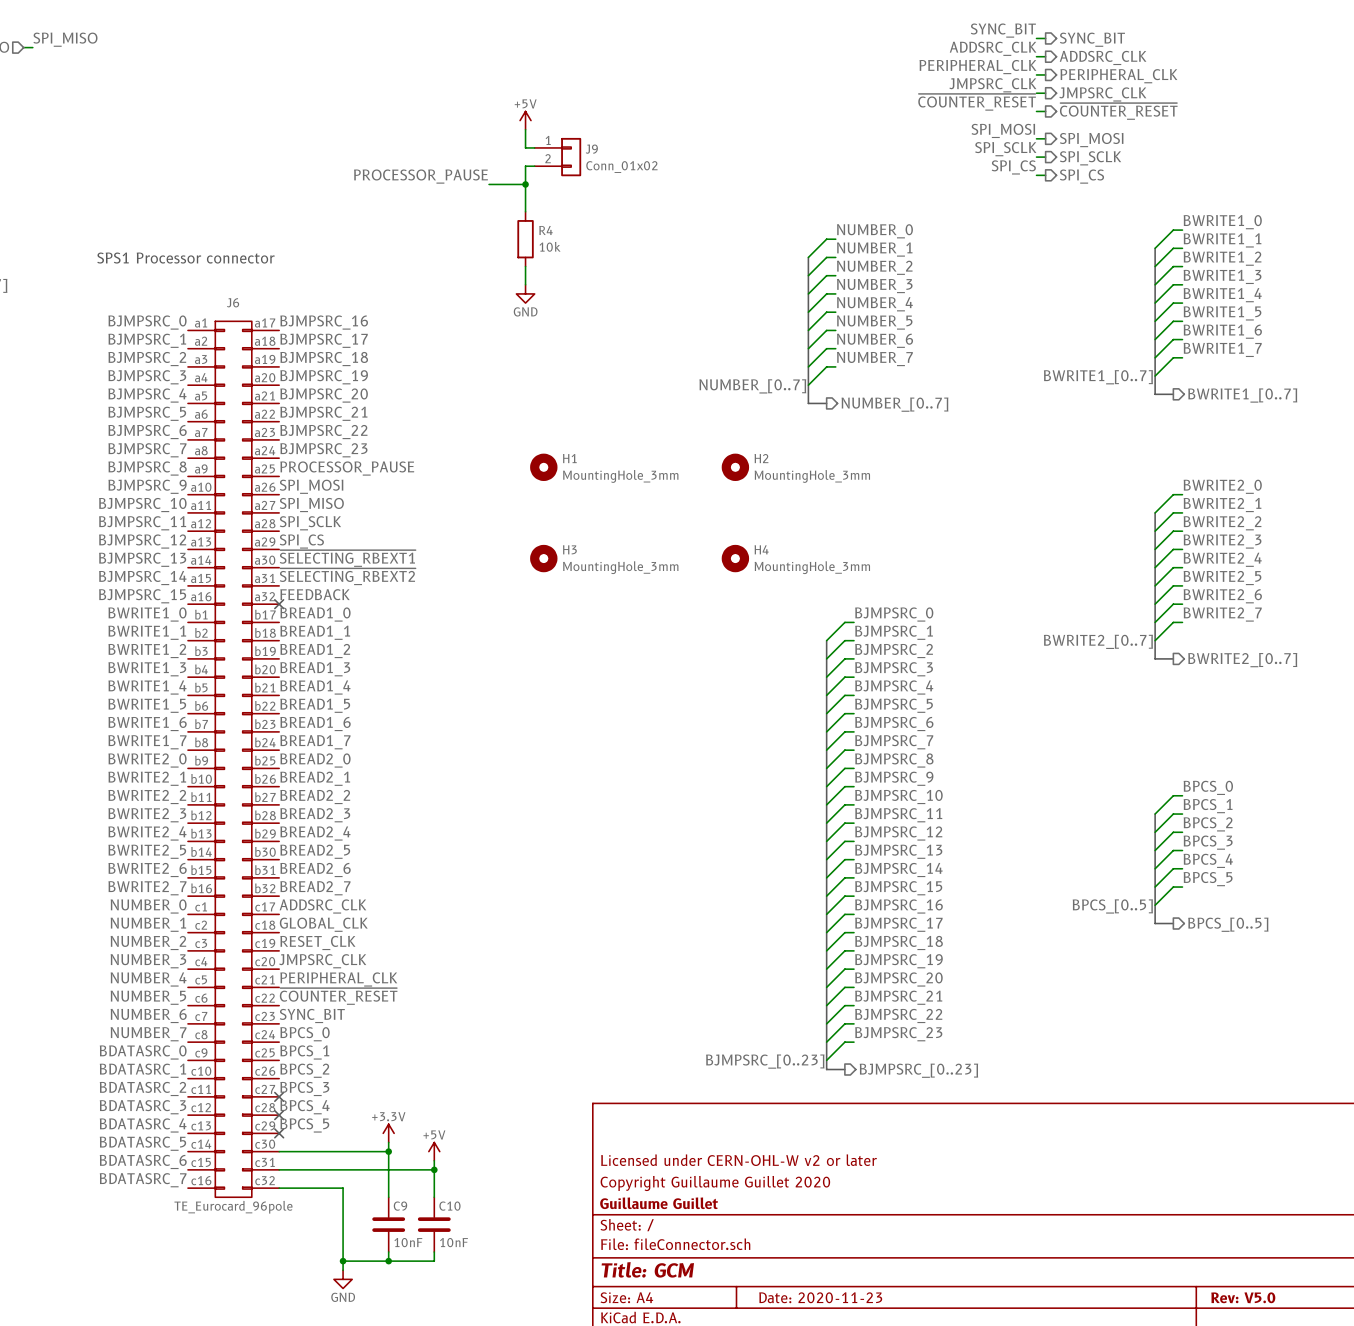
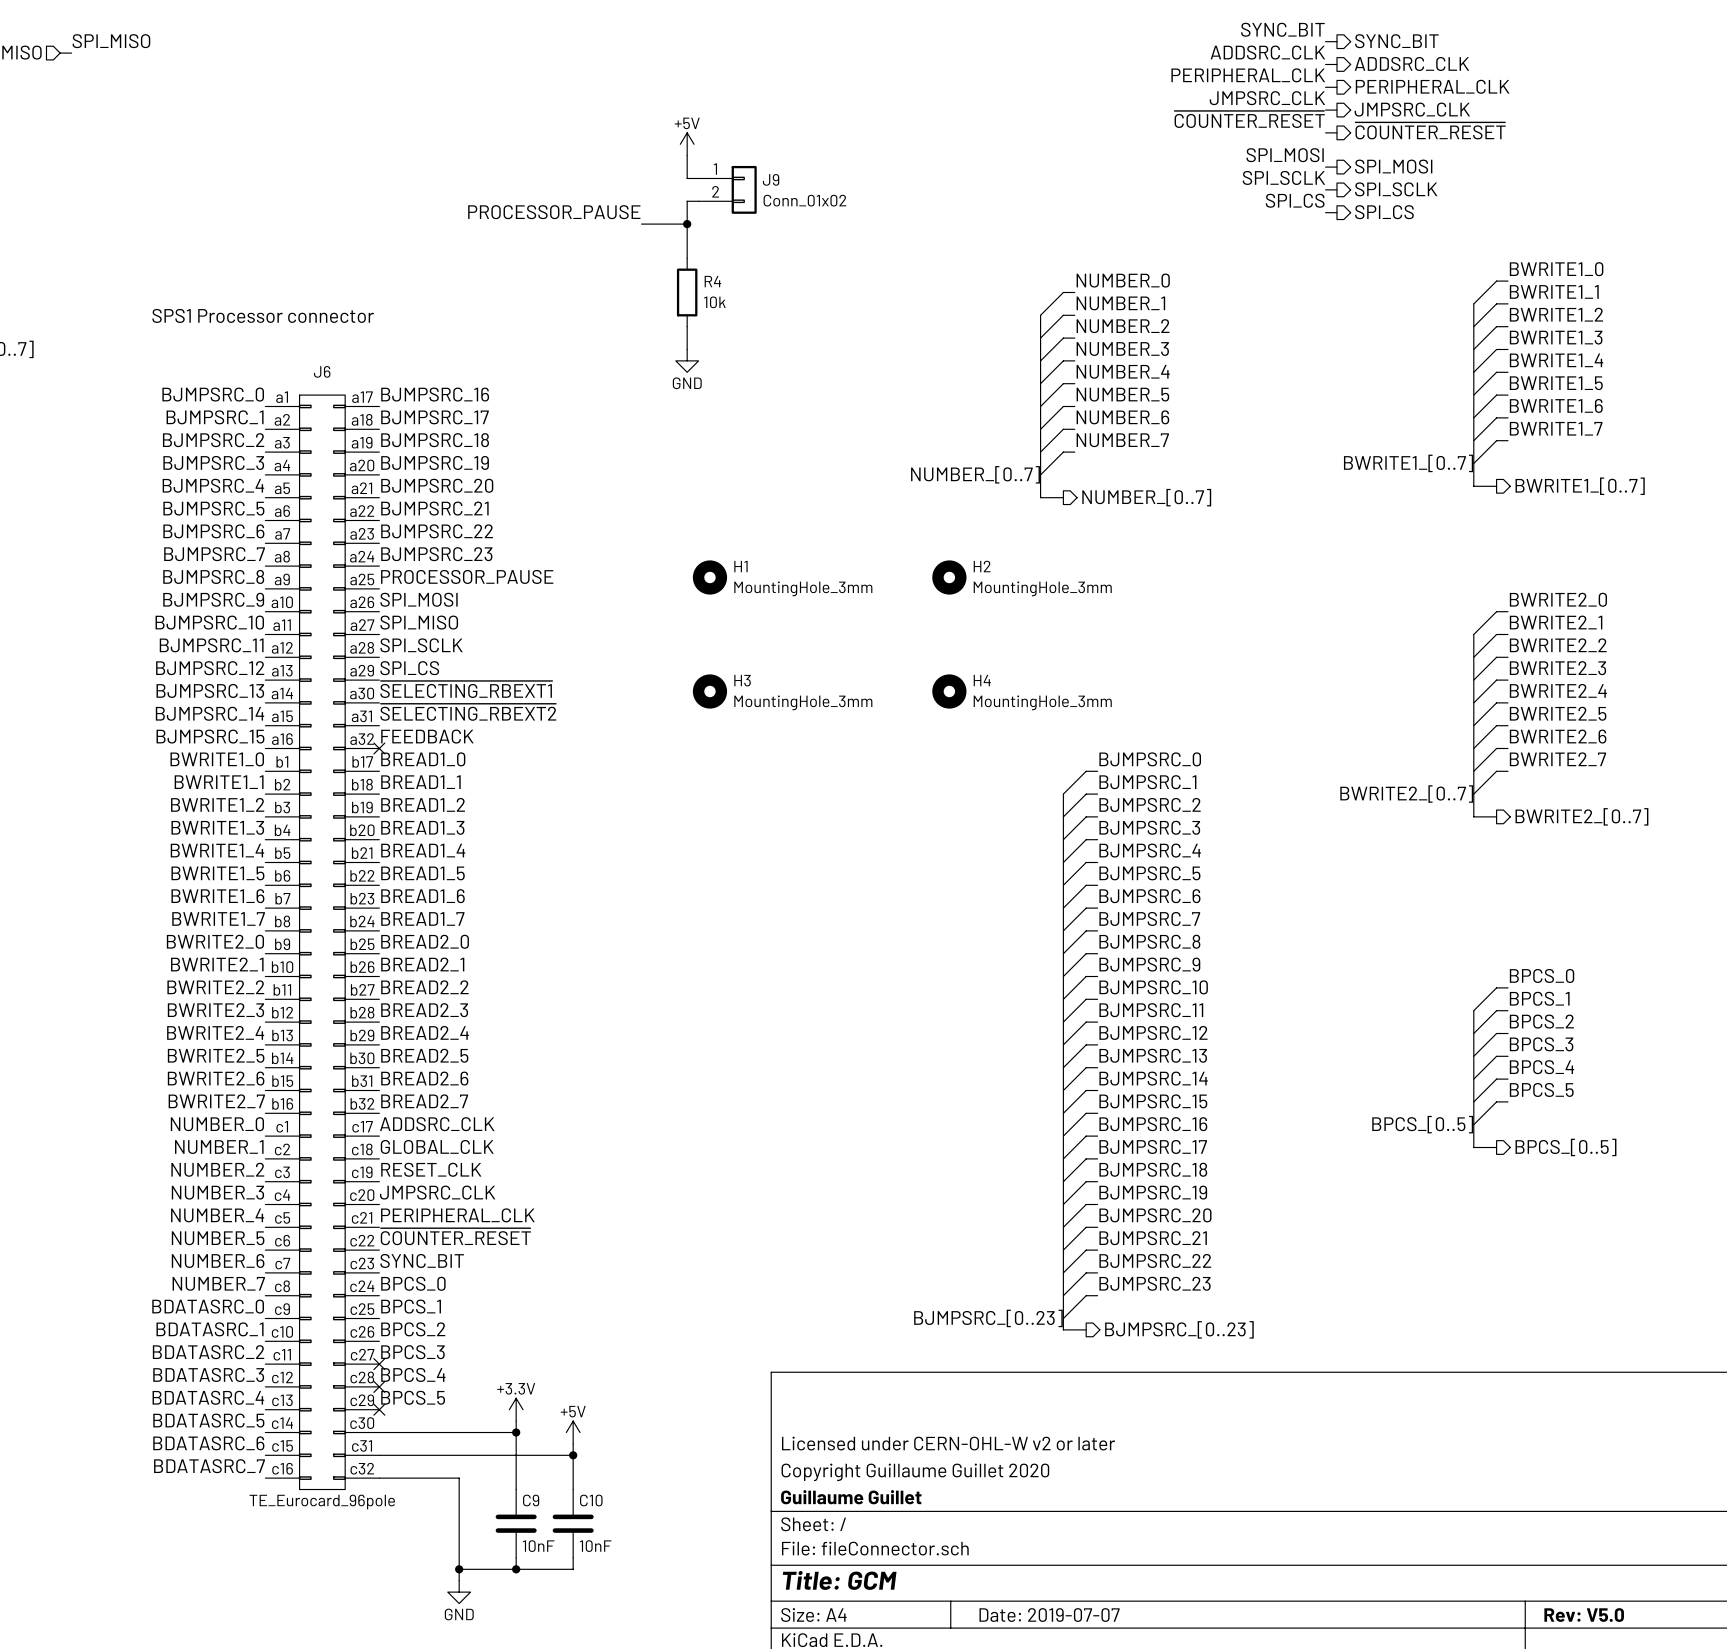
title block: Date: 2020-11-23 (820, 1297) -> Date: 2019-07-07 (1049, 1615)

